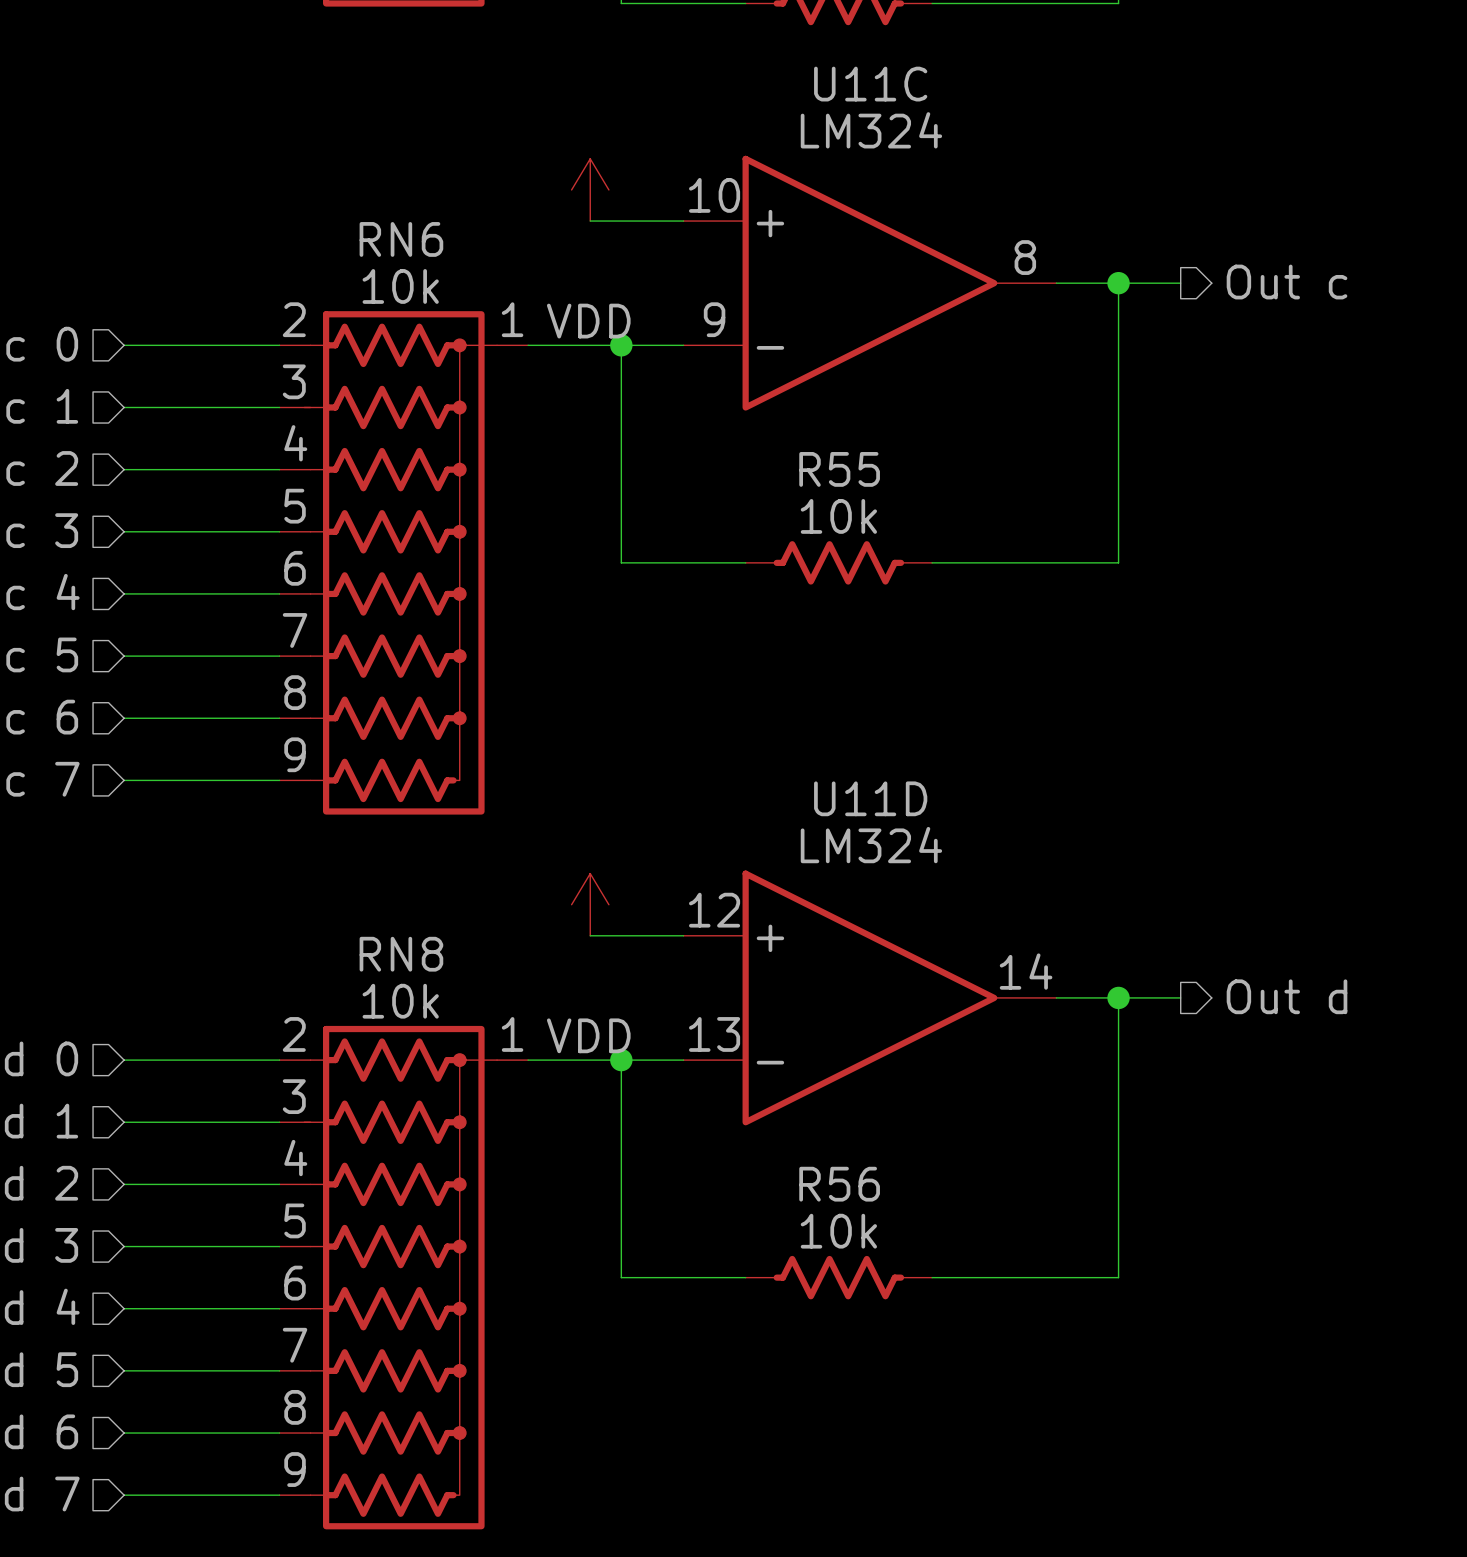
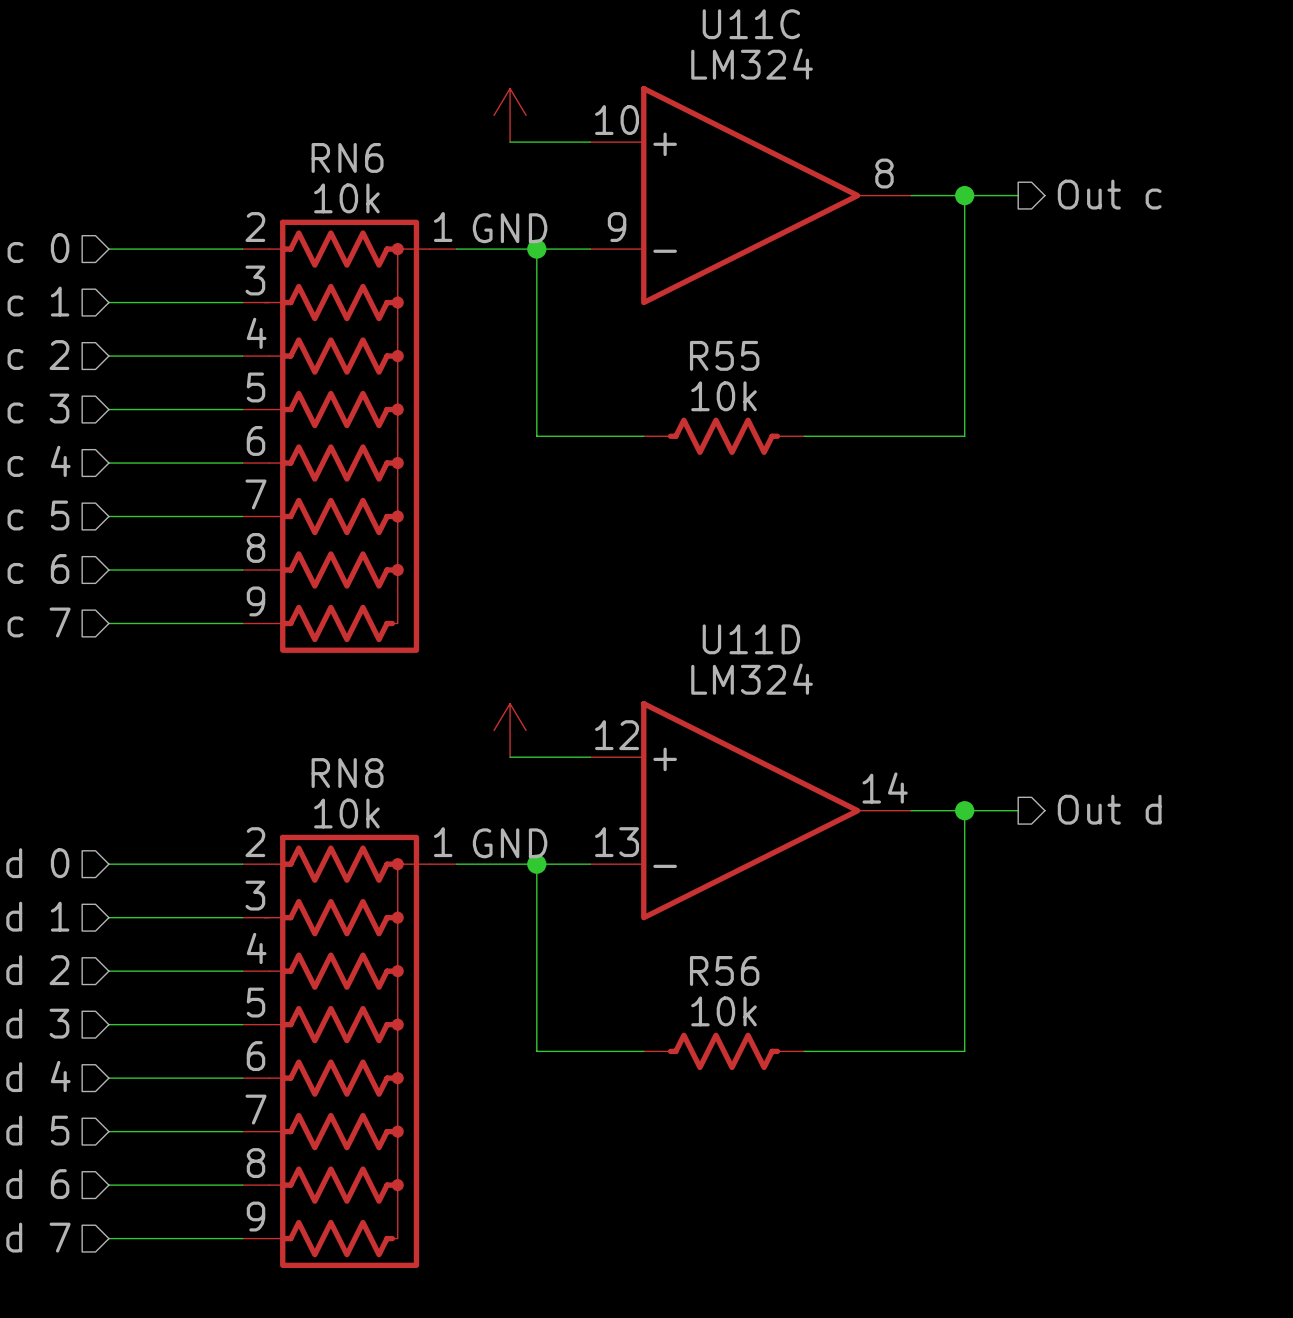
power symbol: VDD (590, 189) -> GND (510, 115)
power symbol: VDD (590, 904) -> GND (510, 730)

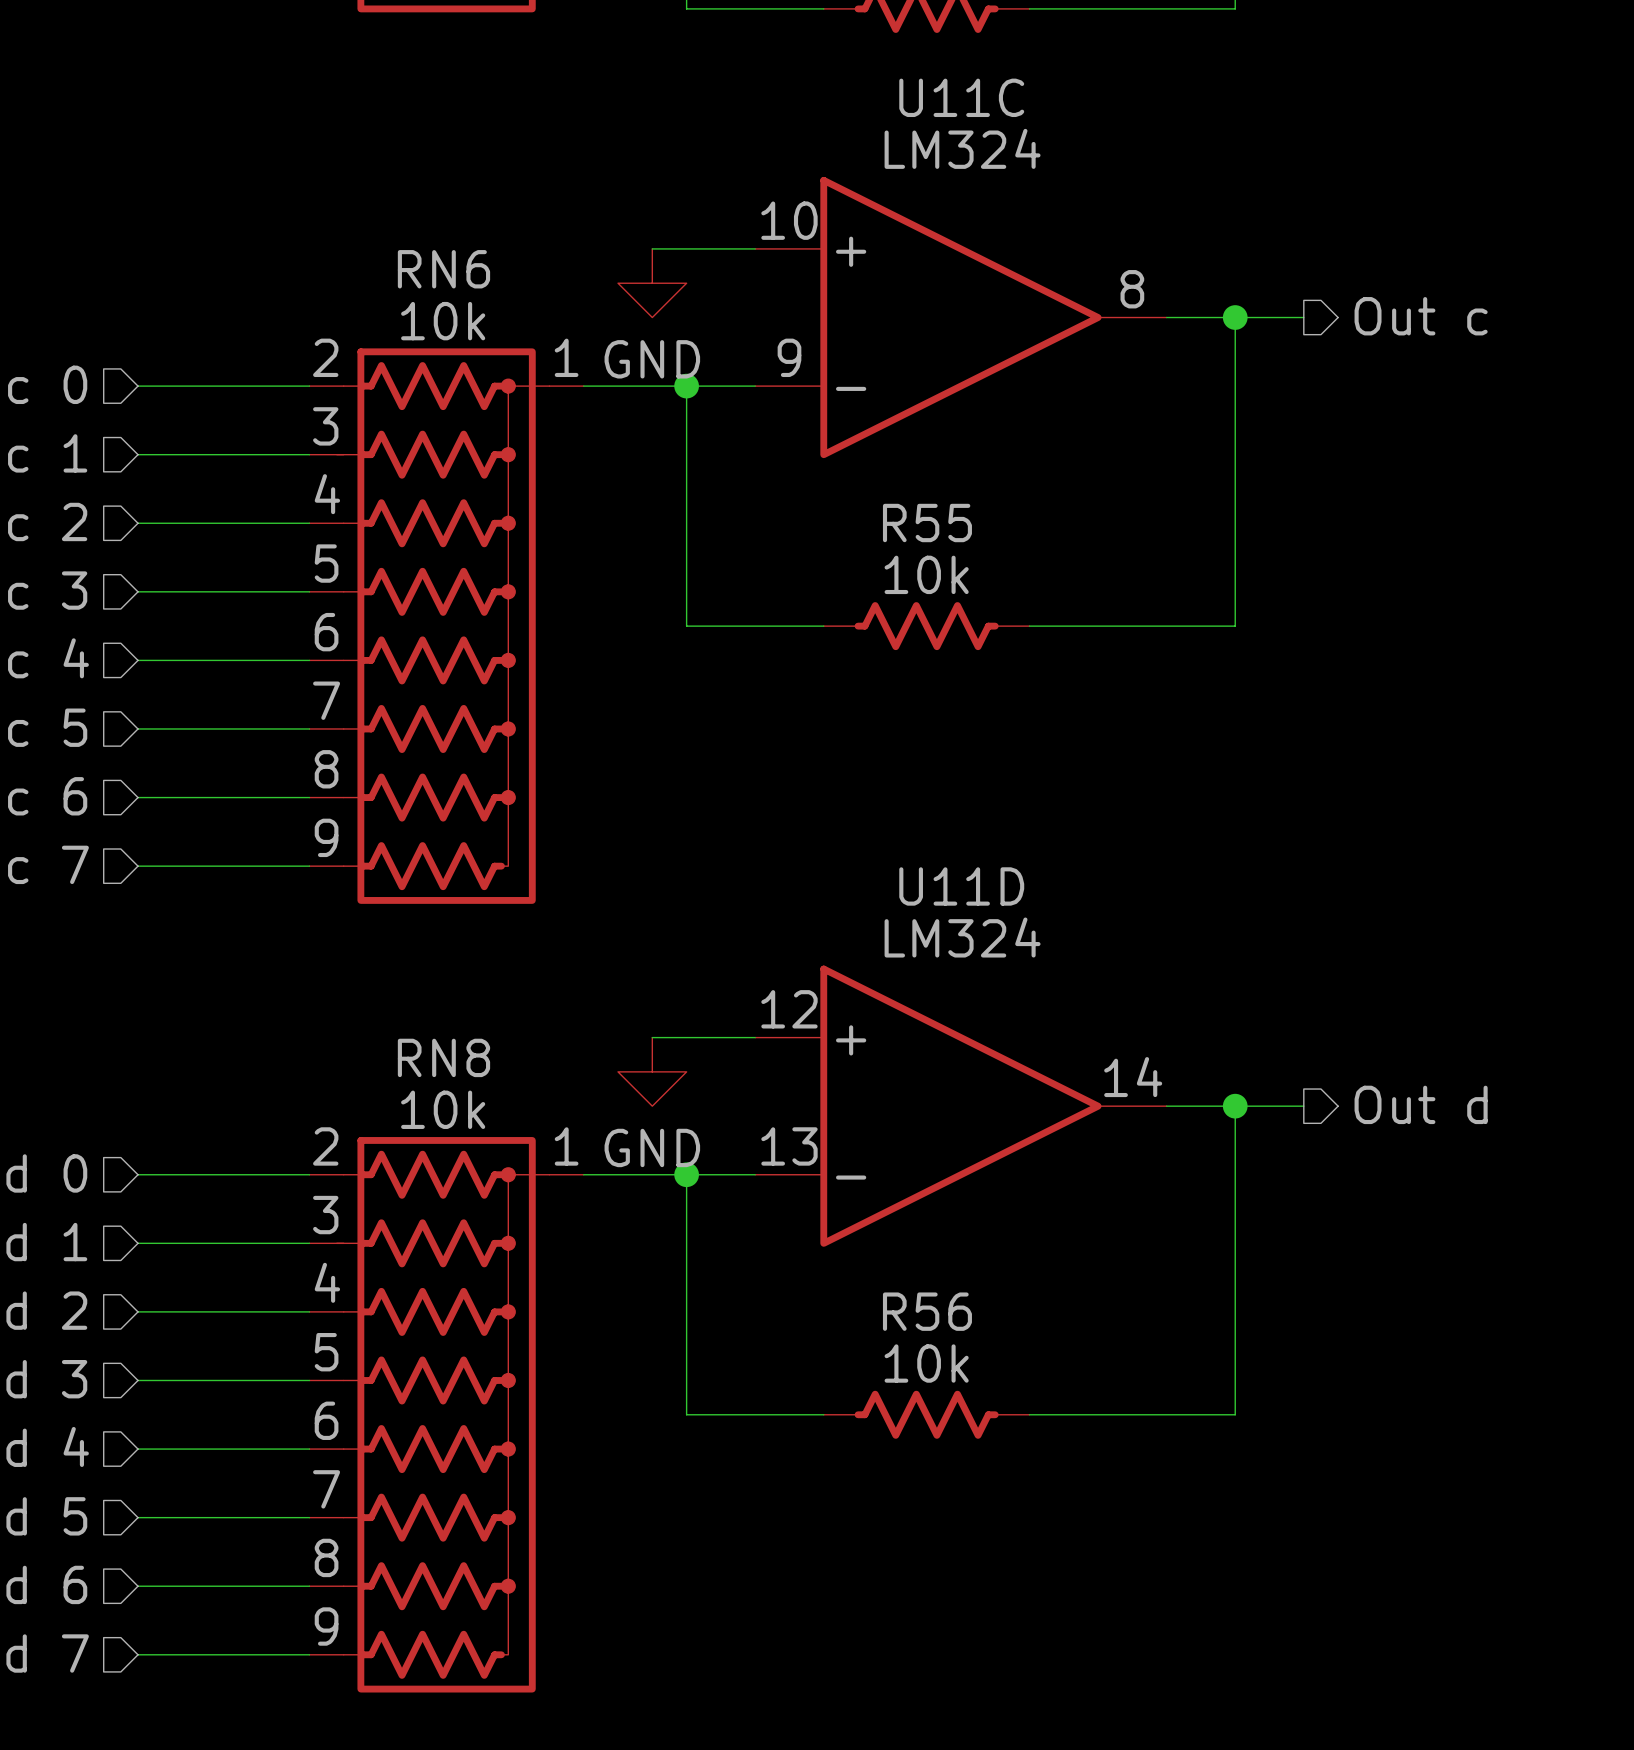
power symbol: GND (510, 115) -> none
power symbol: none -> GND (652, 283)
power symbol: GND (510, 730) -> none
power symbol: none -> GND (652, 1071)

